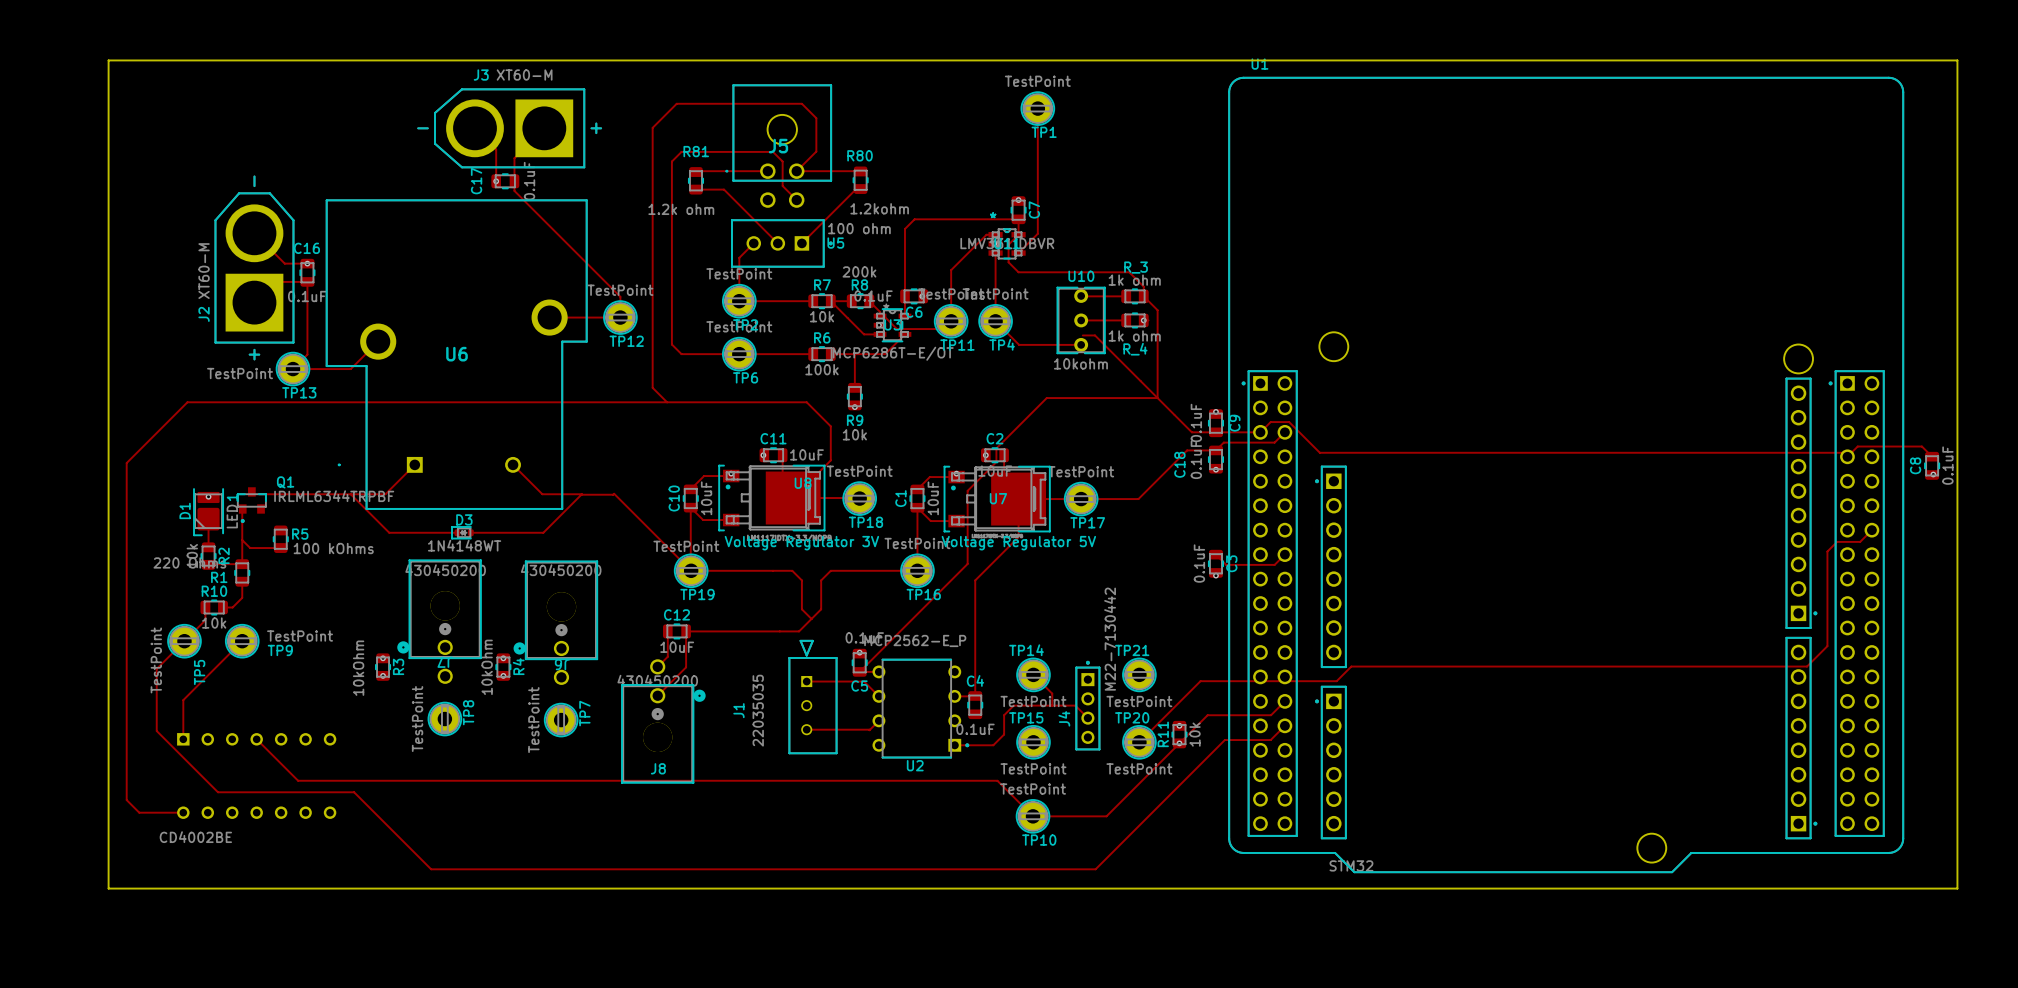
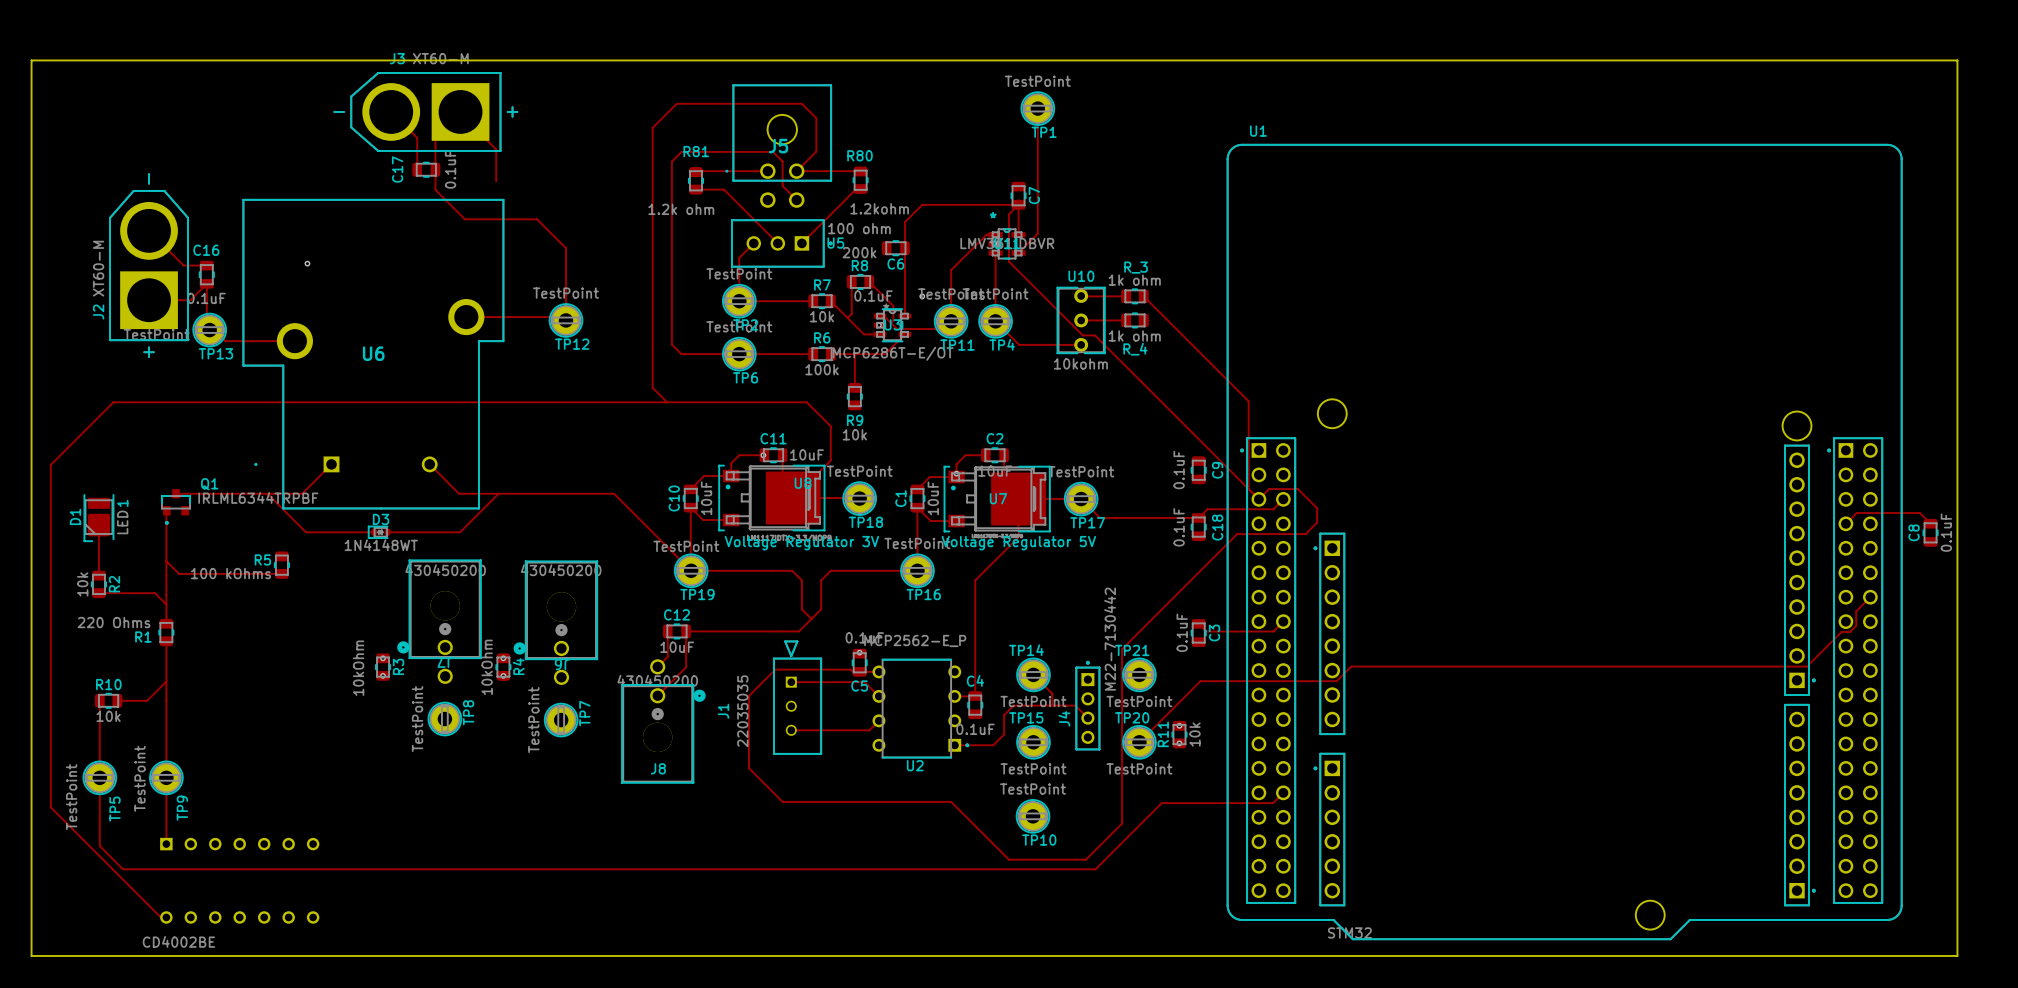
board edge: (108, 60) (108, 888) (1957, 888) -> (108, 60) (31, 60) (31, 955) (1957, 955) (1957, 888)
track: none -> (391, 111) (417, 137) (417, 169)
track: none -> (460, 111) (435, 137) (435, 189) (464, 219) (537, 219) (565, 248) (565, 320) (562, 317) (466, 317)
J3 position: (509, 128) -> (425, 111)
track: (544, 128) (514, 158) (514, 190) (620, 296) (620, 317) (549, 317) -> none
via: (496, 181) -> none
C17 position: (505, 181) -> (426, 169)
via: (1018, 200) -> none
track: none -> (1018, 204) (1018, 219)
track: none -> (1018, 204) (1008, 214) (1008, 261) (1082, 335)
C7 position: (1018, 210) -> (1018, 195)
track: (1018, 219) (914, 219) (904, 228) -> (1018, 204) (922, 204) (904, 222) (904, 228)
track: none -> (149, 230) (183, 265) (206, 265)
track: (254, 233) (284, 263) (307, 263) -> none
track: (1018, 234) (1008, 244) (1008, 262) (1018, 272) (1129, 272) (1143, 286) (1143, 296) -> none
J2 position: (254, 267) -> (149, 265)
C16 position: (307, 272) -> (206, 274)
track: none -> (851, 281) (851, 313) (847, 318)
track: none -> (869, 281) (893, 305) (893, 320) (890, 322)
C6 position: (914, 296) -> (895, 248)
track: none -> (149, 300) (190, 300) (206, 283) (206, 327) (209, 330) (214, 330) (225, 341) (294, 341)
track: (830, 301) (851, 301) -> none
R8 position: (860, 301) -> (860, 281)
track: (869, 301) (880, 311) (880, 316) -> none
track: (254, 302) (275, 281) (307, 281) (307, 354) (293, 369) (350, 369) (378, 341) -> none
track: (1157, 310) (1157, 398) (1046, 398) (996, 448) (996, 462) (967, 490) (967, 563) (859, 671) -> (1258, 499) (1269, 489) (1297, 489) (1317, 508) (1317, 522) (1305, 534) (1237, 534) (1122, 649) (1122, 823) (1085, 859) (1008, 859) (951, 801) (782, 801) (748, 768) (748, 695) (775, 669) (850, 669) (852, 671) (859, 671)
track: none -> (1157, 310) (1248, 401) (1248, 489) (1258, 499)
TP12 position: (620, 317) -> (565, 320)
via: (1143, 320) -> none
U6 position: (456, 354) -> (373, 354)
TP13 position: (293, 369) -> (209, 330)
track: (187, 402) (126, 463) (126, 800) (139, 812) (183, 812) -> (187, 402) (113, 402) (50, 464) (50, 807) (160, 917) (166, 917)
via: (854, 407) -> none
via: (1215, 411) -> none
C9 position: (1215, 423) -> (1198, 470)
track: (1191, 432) (1260, 432) (1270, 422) (1289, 422) (1319, 452) (1843, 452) (1847, 456) (1857, 446) (1921, 446) (1932, 456) -> (1191, 432) (1258, 499)
track: (1284, 432) (1274, 442) (1223, 442) (1215, 450) (1187, 450) (1138, 499) (1081, 499) -> (1283, 499) (1273, 509) (1207, 509) (1198, 517) (1100, 517) (1081, 499)
track: none -> (763, 455) (739, 455) (731, 463) (731, 473)
track: none -> (985, 455) (965, 455) (956, 464) (956, 473)
via: (985, 455) -> none
C18 position: (1215, 459) -> (1198, 527)
track: (414, 464) (385, 494) (259, 494) -> (331, 464) (302, 493) (176, 493)
track: (513, 464) (542, 494) (581, 494) (543, 532) (470, 532) -> none
C18 name position: C18 (1179, 464) -> C18 (1217, 527)
C8 position: (1932, 465) -> (1930, 532)
via: (1215, 469) -> none
via: (731, 473) -> none
U1 position: (1566, 474) -> (1564, 542)
via: (1933, 474) -> none
track: none -> (498, 493) (460, 532) (387, 532)
track: (614, 493) (581, 494) -> (614, 493) (459, 493) (429, 464)
track: (350, 494) (389, 532) (457, 532) -> (267, 493) (305, 532) (374, 532)
via: (208, 496) -> none
Q1 position: (251, 505) -> (176, 506)
track: (242, 508) (242, 564) (208, 564) -> none
track: none -> (166, 510) (166, 623)
D1 position: (208, 512) -> (98, 518)
track: (208, 519) (208, 547) -> none
track: none -> (1930, 523) (1919, 513) (1856, 513) (1845, 523)
track: none -> (98, 525) (98, 575)
track: (1871, 530) (1860, 541) (1837, 541) (1827, 551) (1827, 646) -> (1841, 631) (1827, 646)
D3 position: (462, 532) -> (379, 532)
R5 name position: R5 (300, 534) -> R5 (262, 559)
R5 position: (280, 539) -> (281, 565)
track: (242, 540) (250, 548) (280, 548) -> none
R5 value position: 100 kOhms (333, 548) -> 100 kOhms (231, 573)
track: (1215, 554) (1226, 564) (1274, 564) (1284, 554) -> none
R2 position: (208, 556) -> (98, 584)
track: none -> (166, 561) (179, 573) (281, 573)
C3 position: (1215, 563) -> (1198, 633)
R1 position: (242, 572) -> (166, 632)
via: (1215, 575) -> none
track: (242, 581) (242, 597) (232, 607) (222, 607) -> none
track: none -> (98, 593) (155, 593) (166, 604)
track: none -> (1870, 597) (1856, 611) (1856, 625) (1850, 631)
track: (205, 607) (205, 620) (156, 668) (156, 731) (218, 792) (354, 792) (431, 869) -> (99, 700) (99, 846) (123, 869) (431, 869)
R10 position: (214, 607) -> (108, 700)
track: none -> (1283, 621) (1273, 631) (1206, 631) (1198, 623)
TP9 value rotation: 0° (300, 636) -> 90° counterclockwise (140, 778)
track: none -> (166, 641) (166, 844)
TP5 position: (184, 641) -> (99, 777)
track: (242, 641) (183, 700) (183, 739) -> none
TP9 position: (242, 641) -> (166, 777)
TP9 name rotation: 0° (280, 650) -> 90° counterclockwise (182, 808)
track: none -> (166, 681) (147, 700) (117, 700)
track: (806, 681) (864, 682) -> (791, 682) (864, 682)
J1 position: (812, 697) -> (797, 697)
track: (1284, 701) (1271, 715) (1207, 715) (1106, 816) (1033, 816) (997, 780) (298, 780) (256, 739) -> none
track: (1284, 725) (1270, 740) (1224, 740) (1161, 803) -> (1283, 792) (1273, 803) (1161, 803)
track: (806, 729) (869, 730) -> (791, 730) (869, 730)
part position: (256, 776) -> (239, 880)

